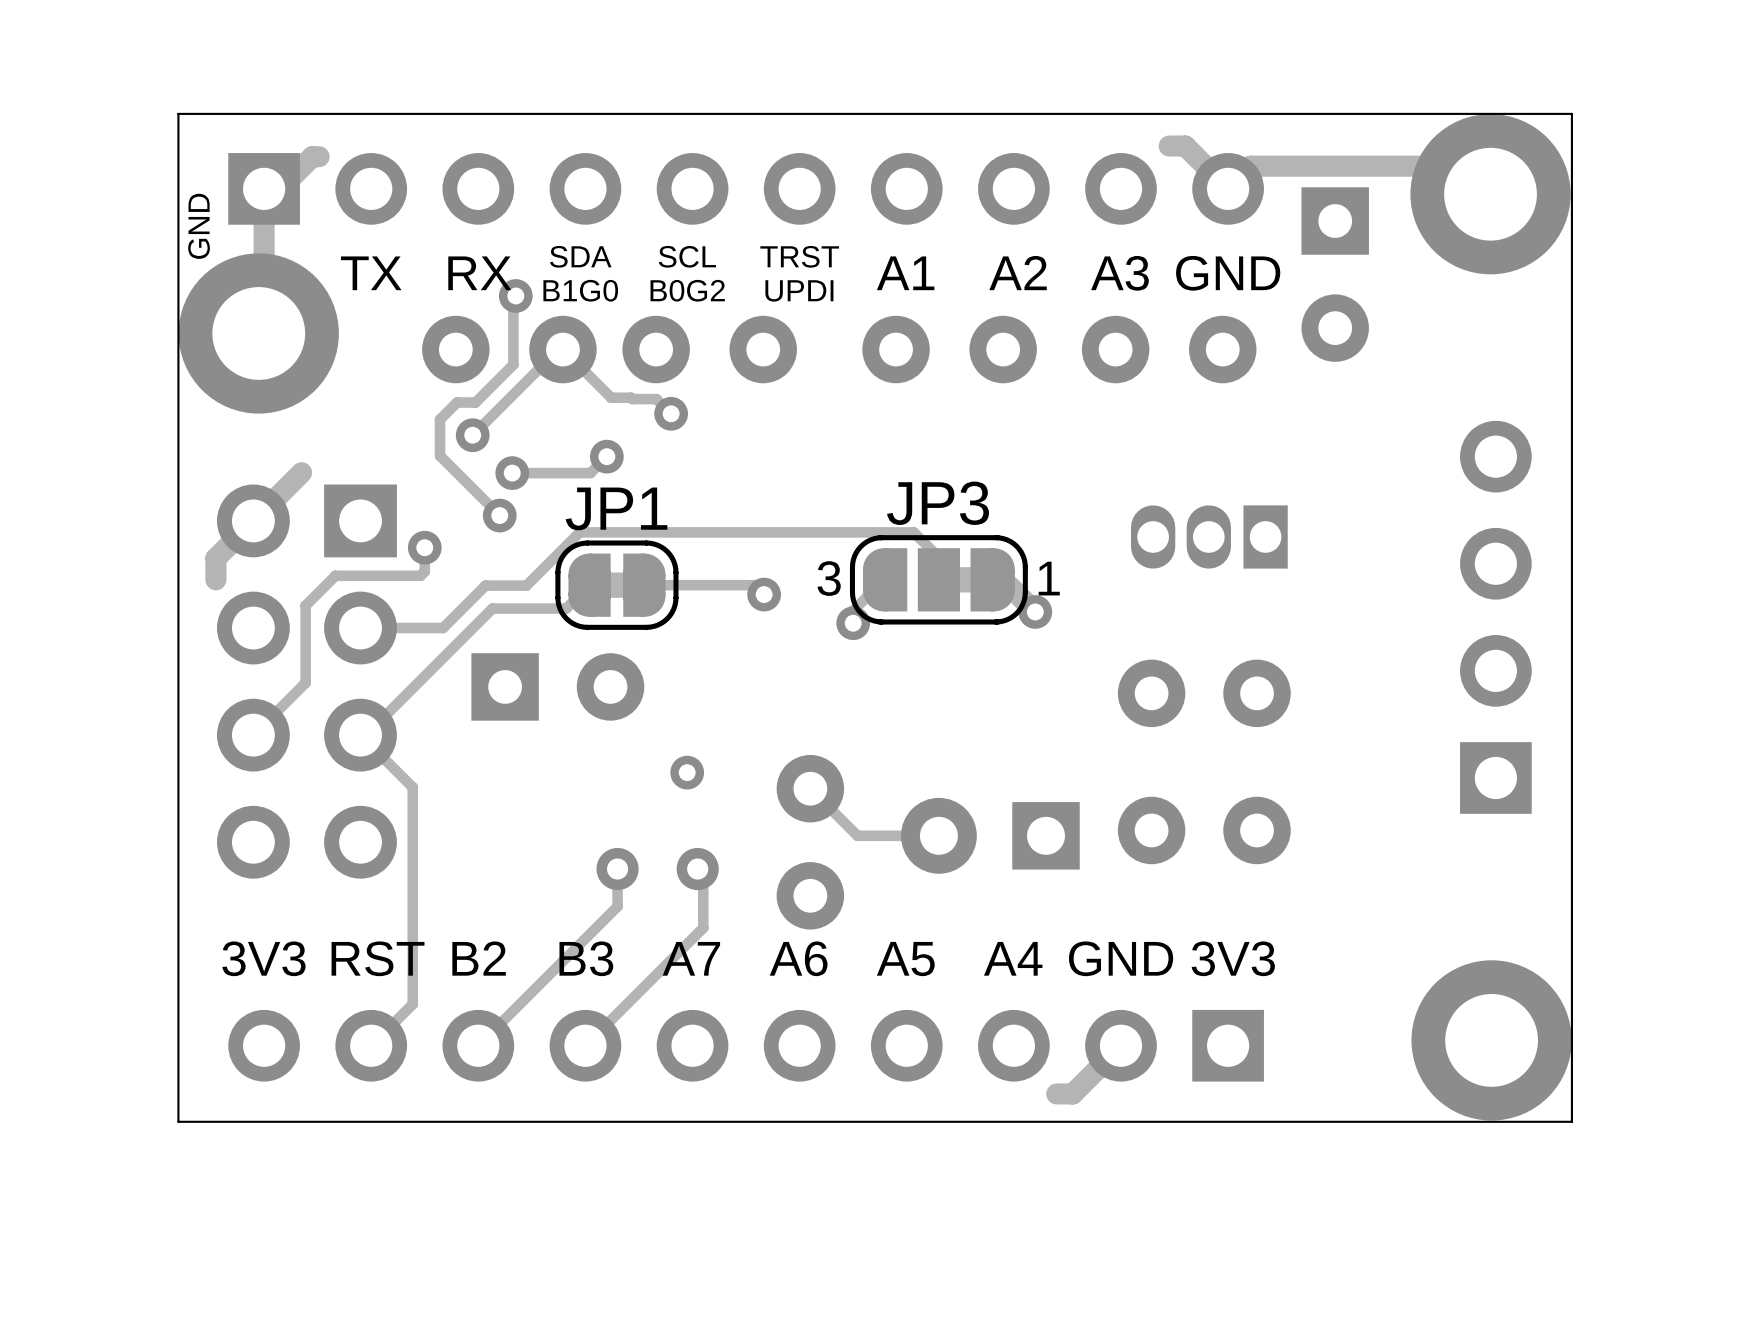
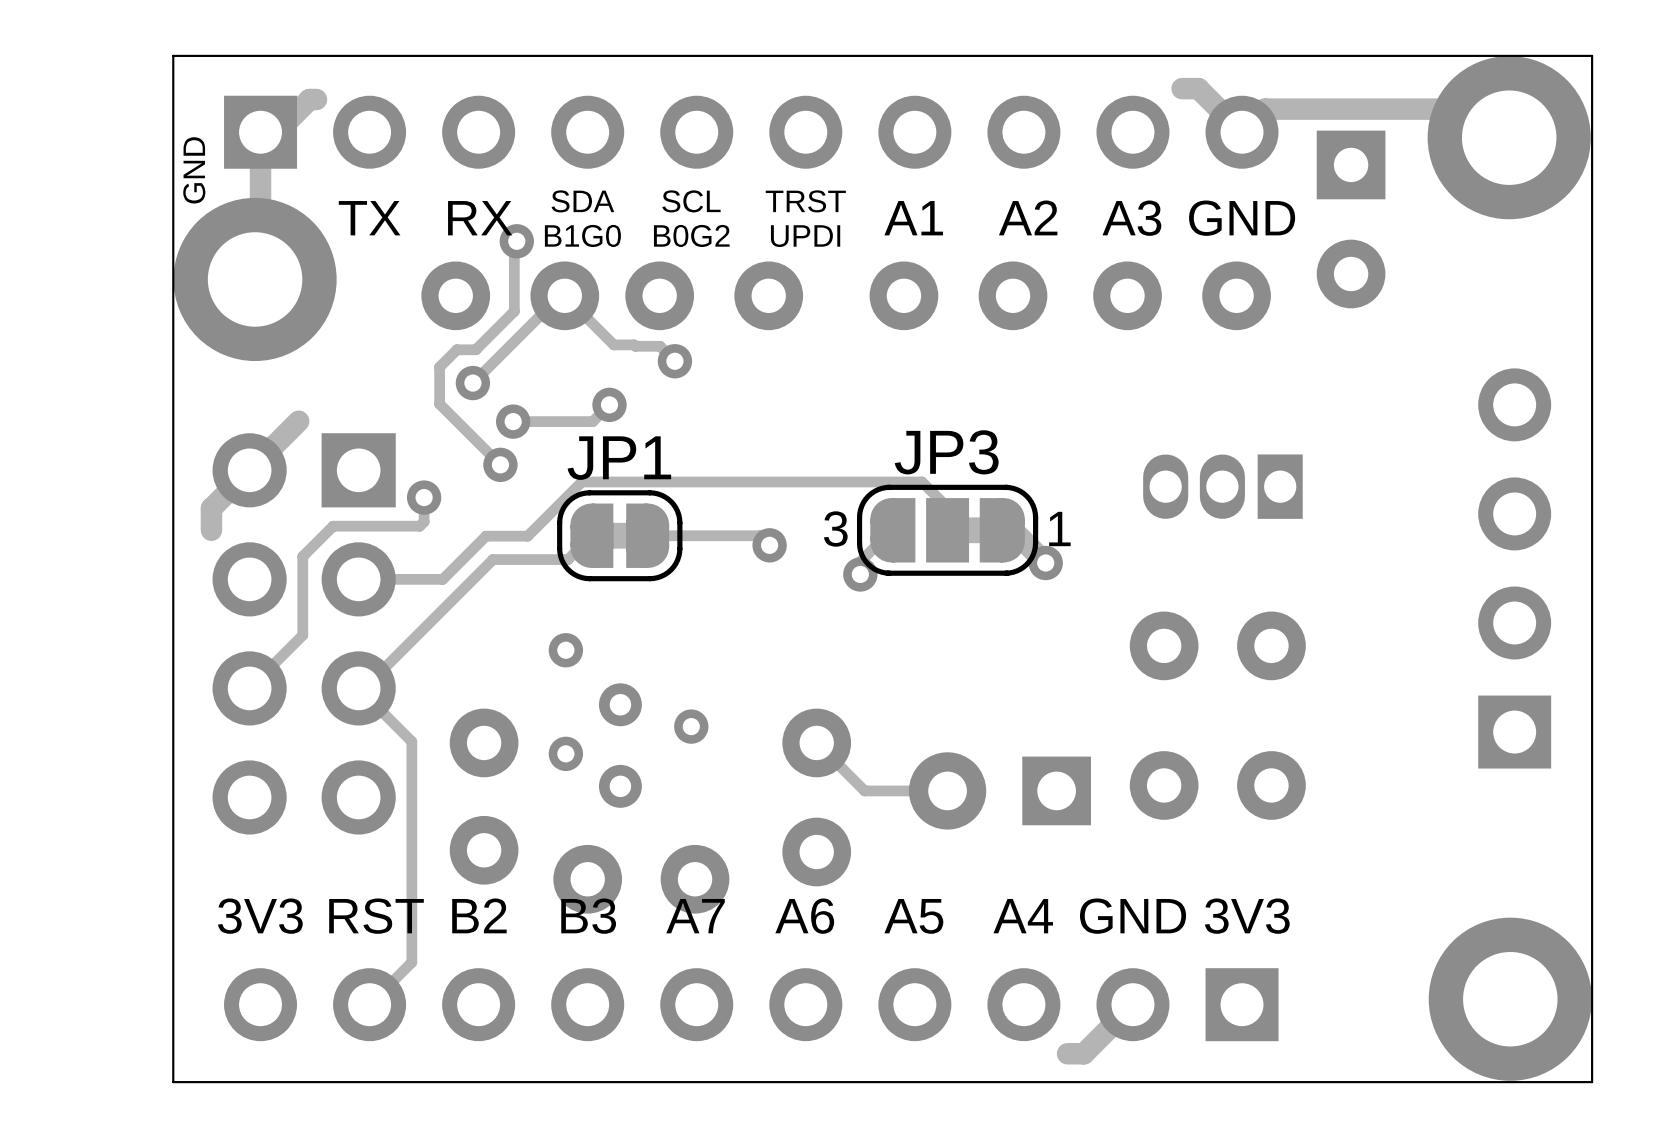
part: (557, 686) -> none
via: none -> (565, 650)
via: none -> (565, 753)
part: none -> (484, 796)
track: (617, 869) (617, 906) (478, 1045) -> none
part rotation: 0° (657, 869) -> 90° clockwise (620, 745)
part position: (657, 869) -> (620, 745)
track: (697, 869) (703, 874) (703, 927) (585, 1045) -> none
part: none -> (641, 879)

